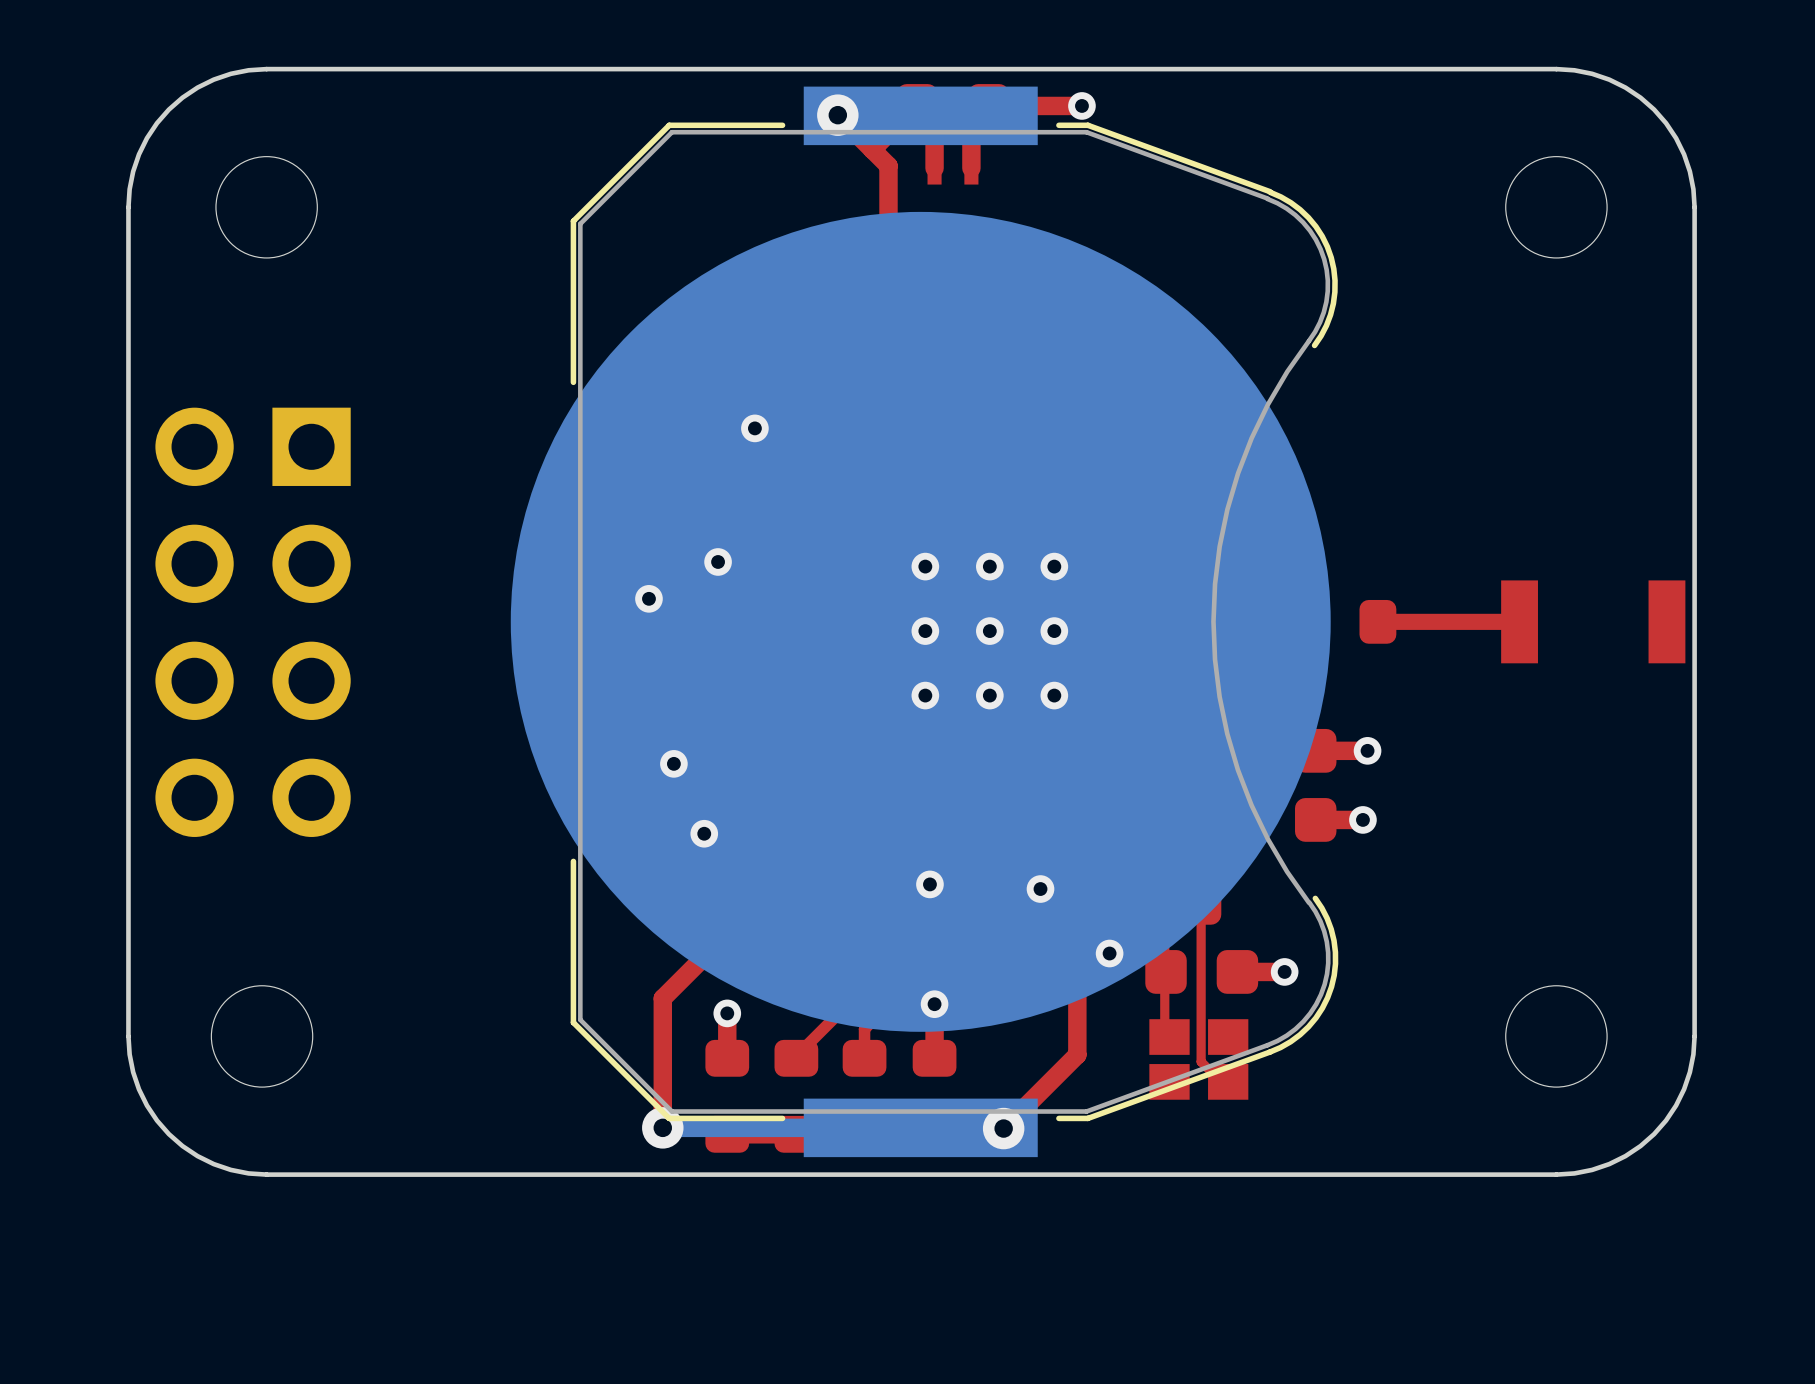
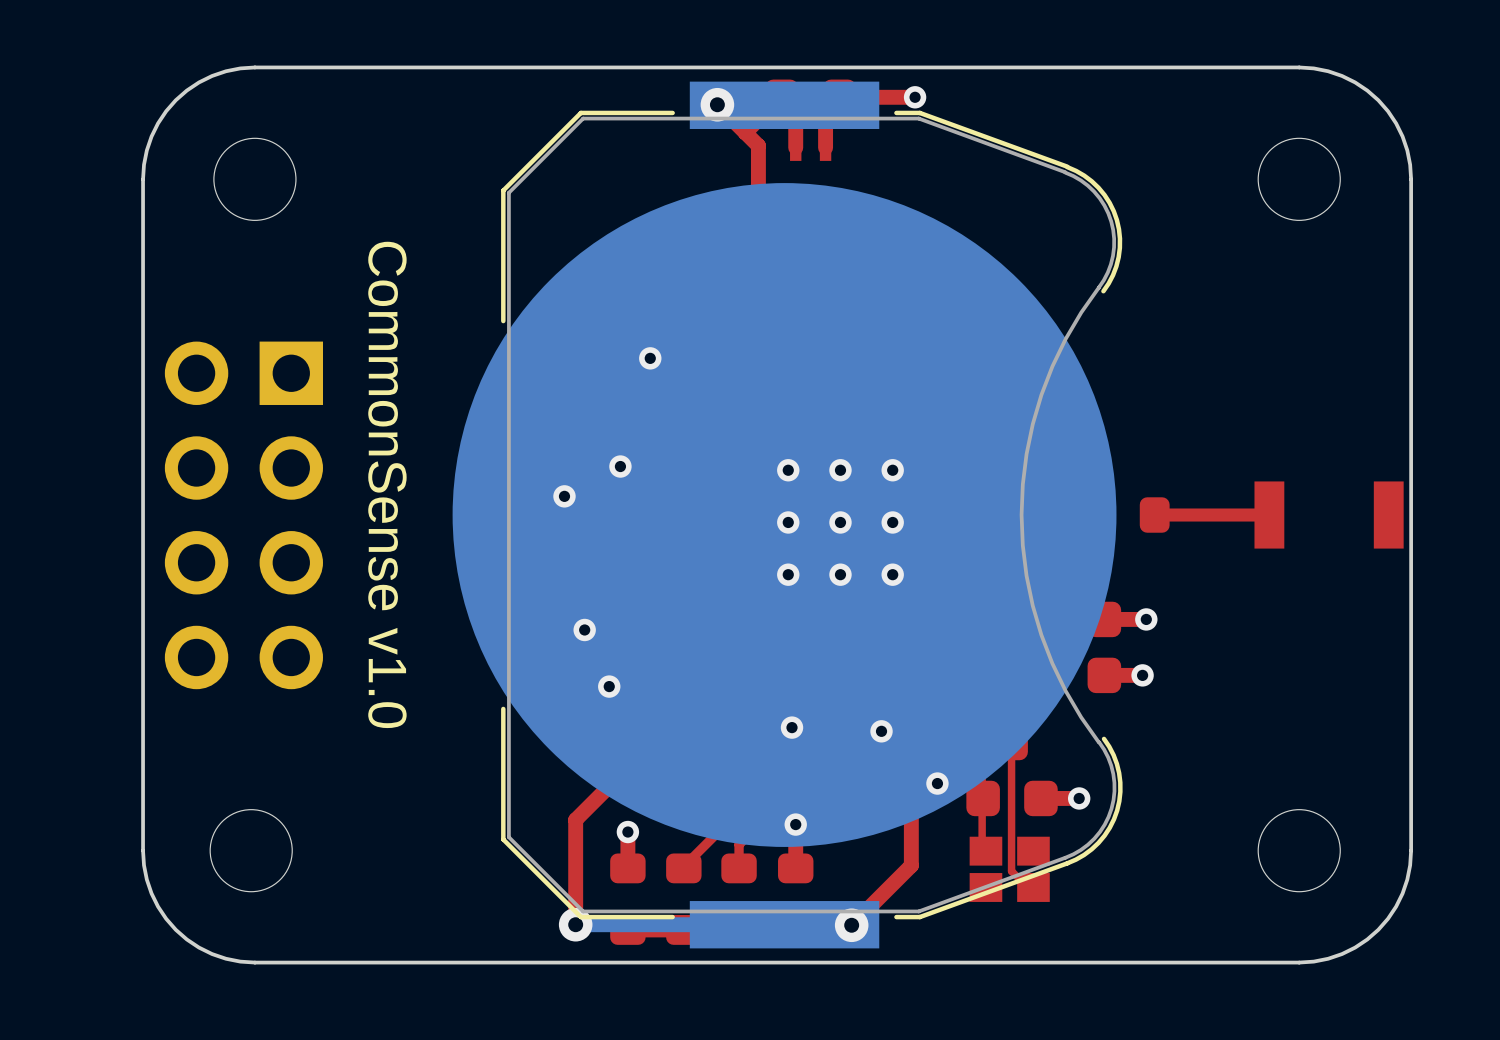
text: none -> CommonSense v1.0 (387, 484)

